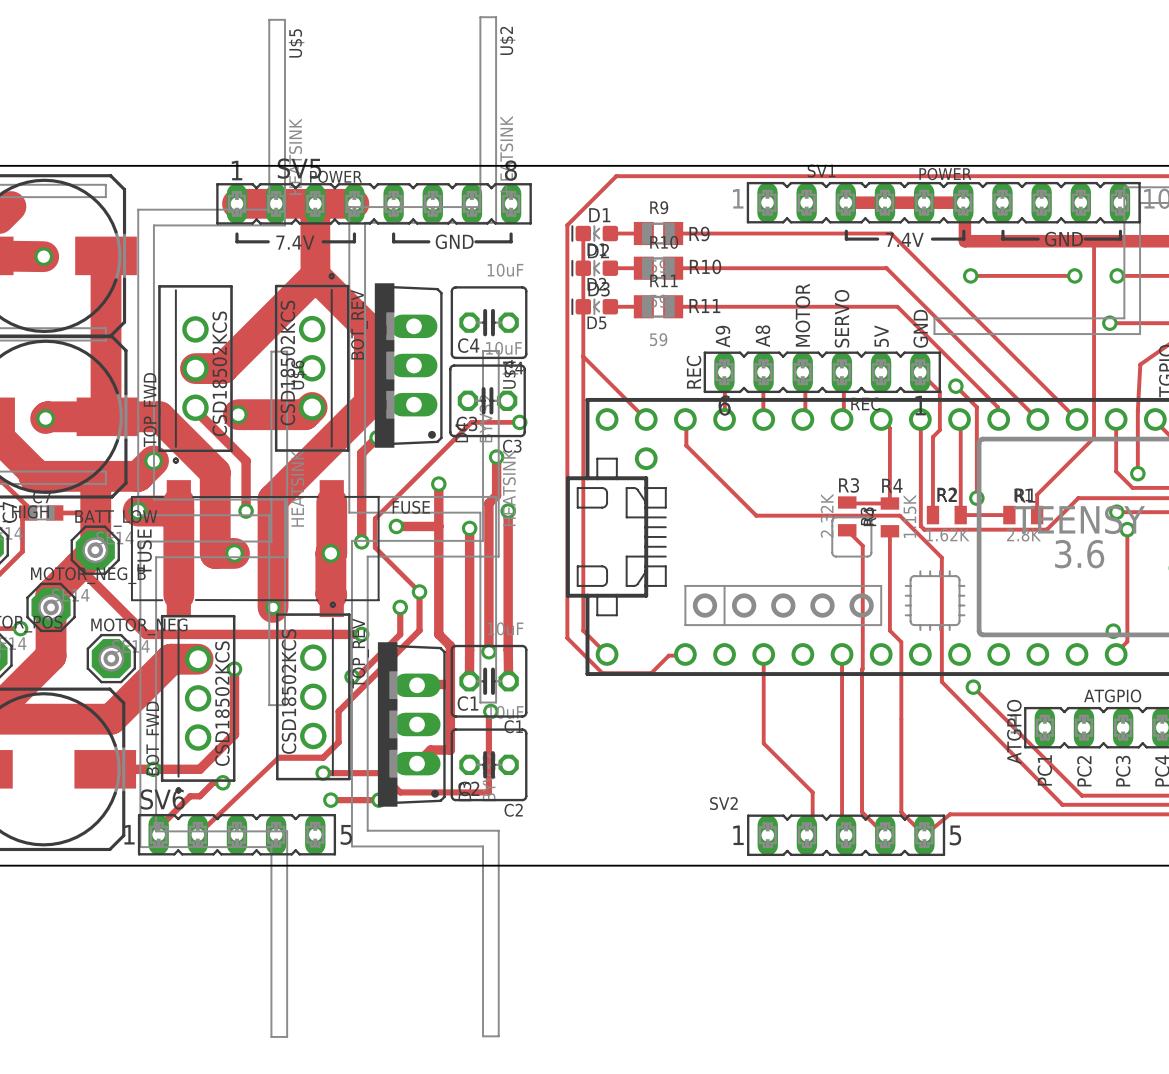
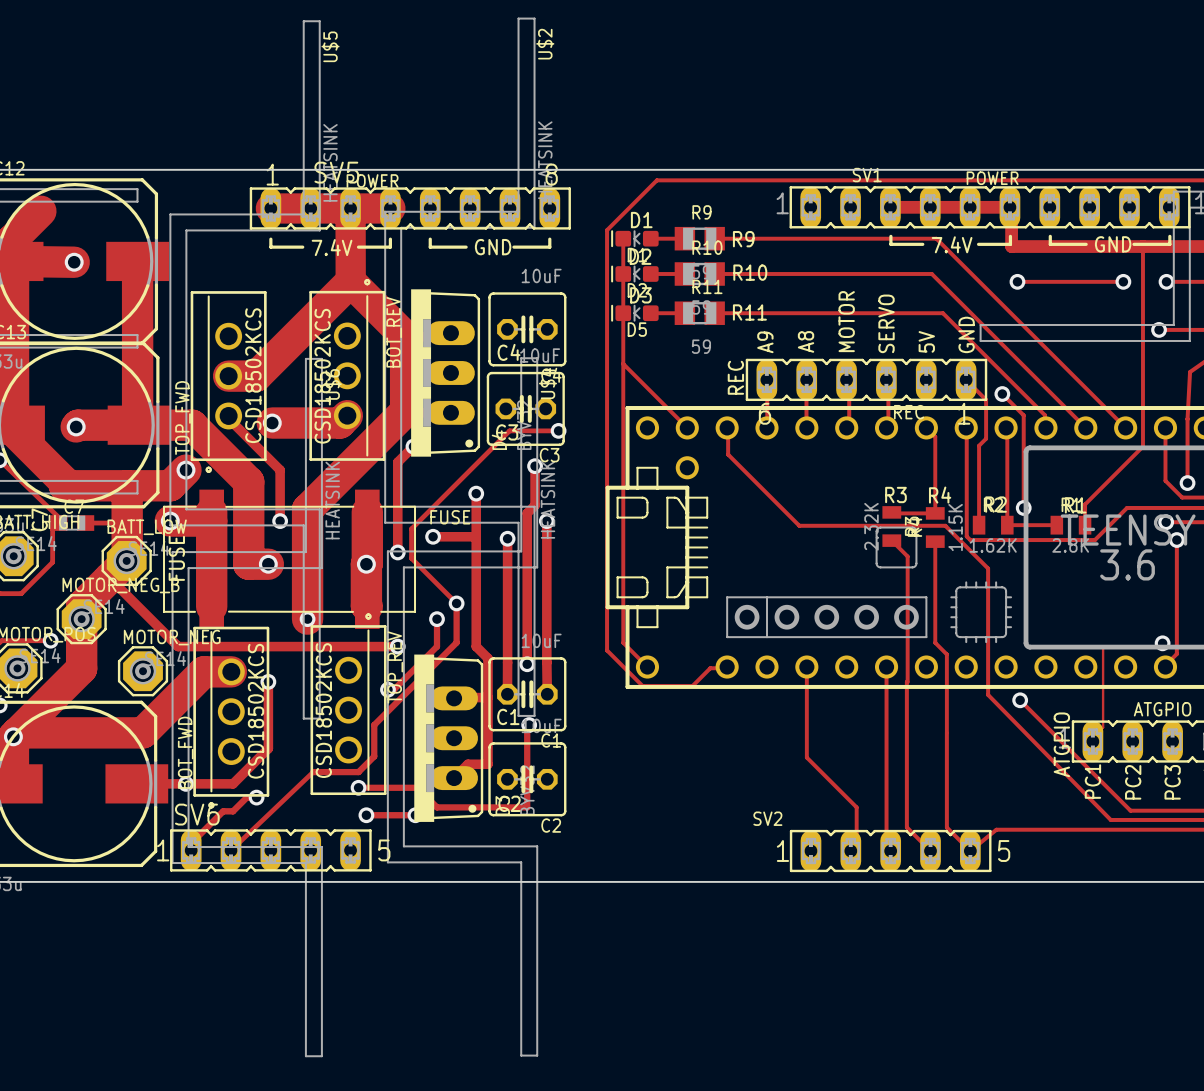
track: none -> (1162, 643) (1157, 647) (1103, 647) (1103, 727) (1093, 737) (1092, 741)

